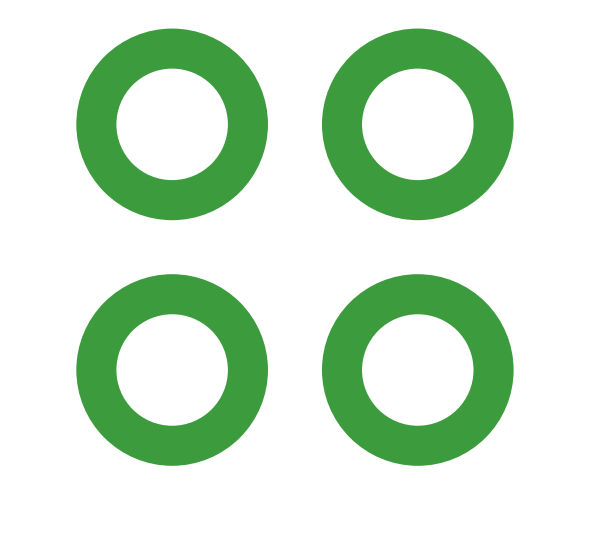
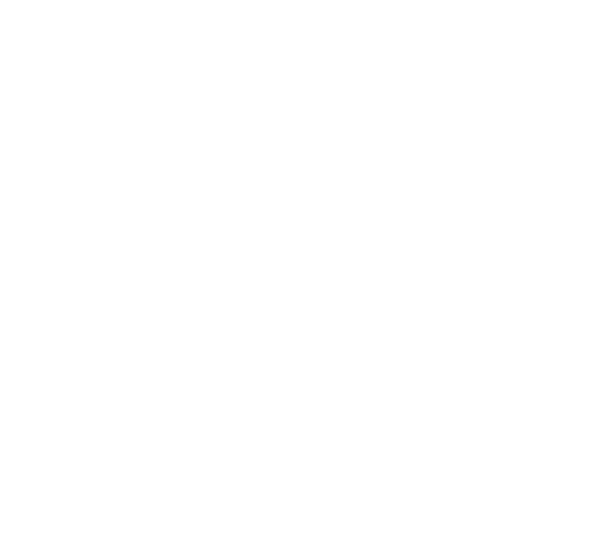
part: (172, 124) -> none
part: (417, 124) -> none
part: (172, 370) -> none
part: (417, 370) -> none

